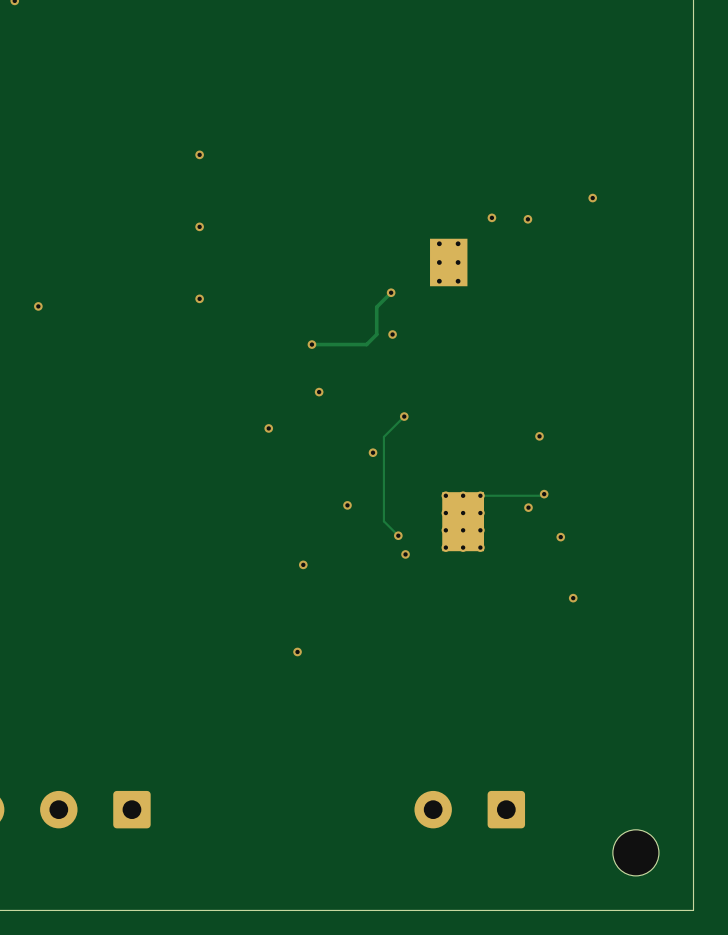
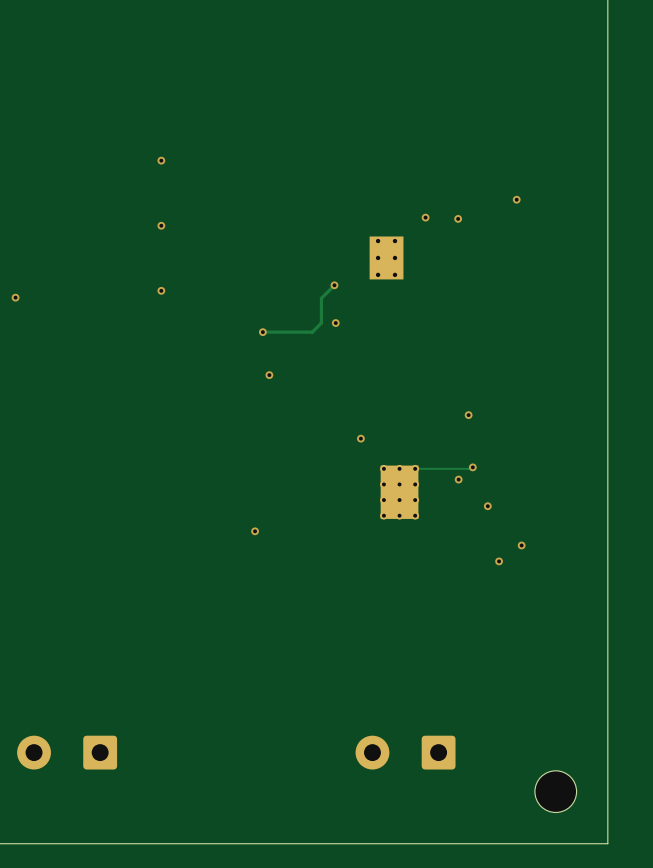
track: (404, 416) (383, 436) (383, 521) (398, 535) -> none
via: (404, 416) -> none
via: (268, 428) -> none
via: (373, 452) -> none
via: none -> (360, 438)
via: (347, 505) -> none
via: (398, 535) -> none
via: (405, 554) -> none
via: none -> (521, 545)
via: (297, 651) -> none

